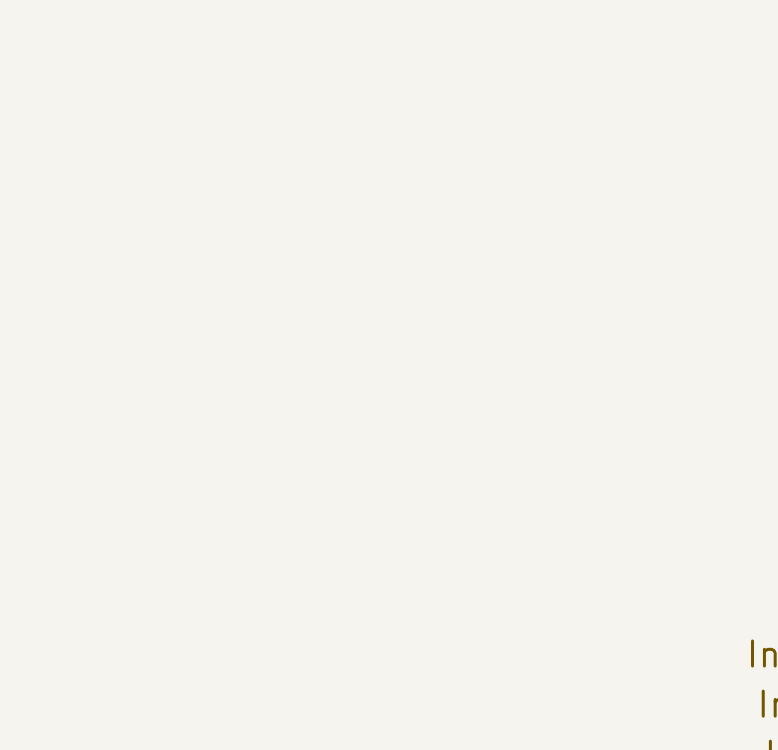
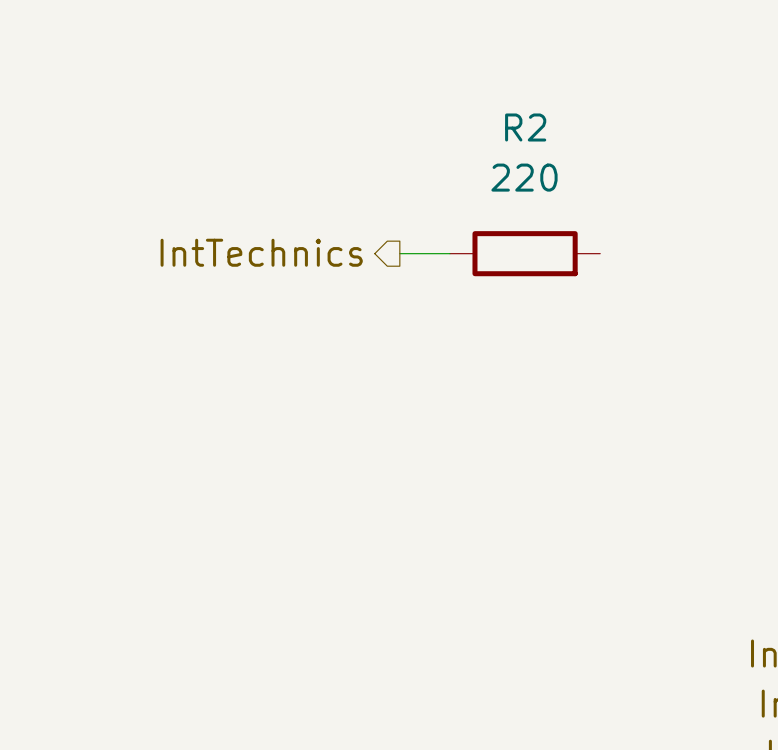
hierarchical label: none -> IntTechnics (261, 252)
wire: none -> (399, 253) (449, 253)
R2: none -> 220 (525, 253)

